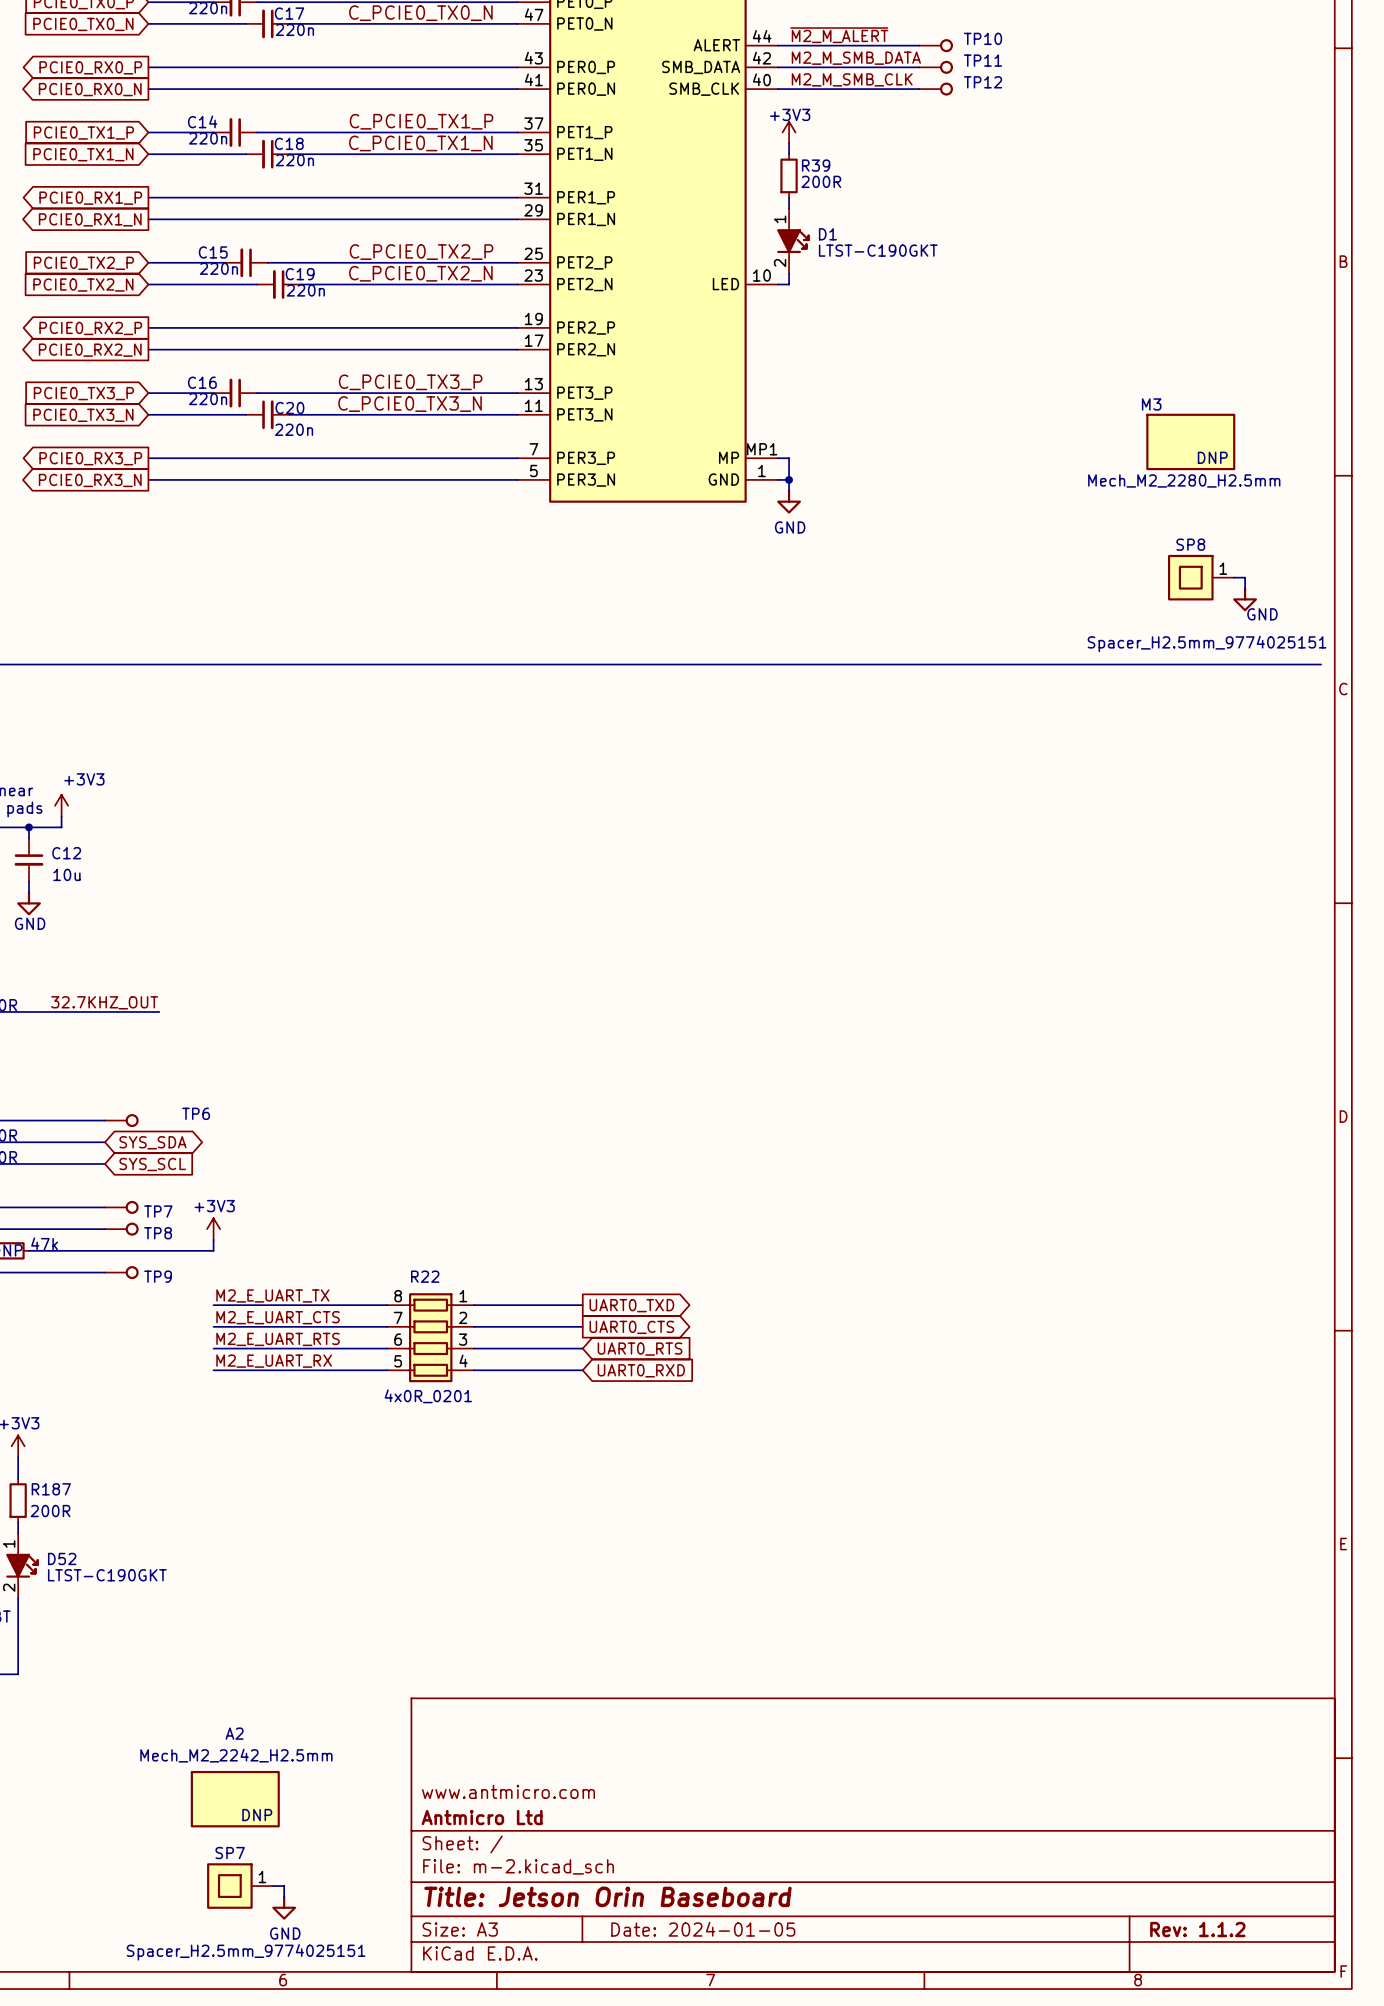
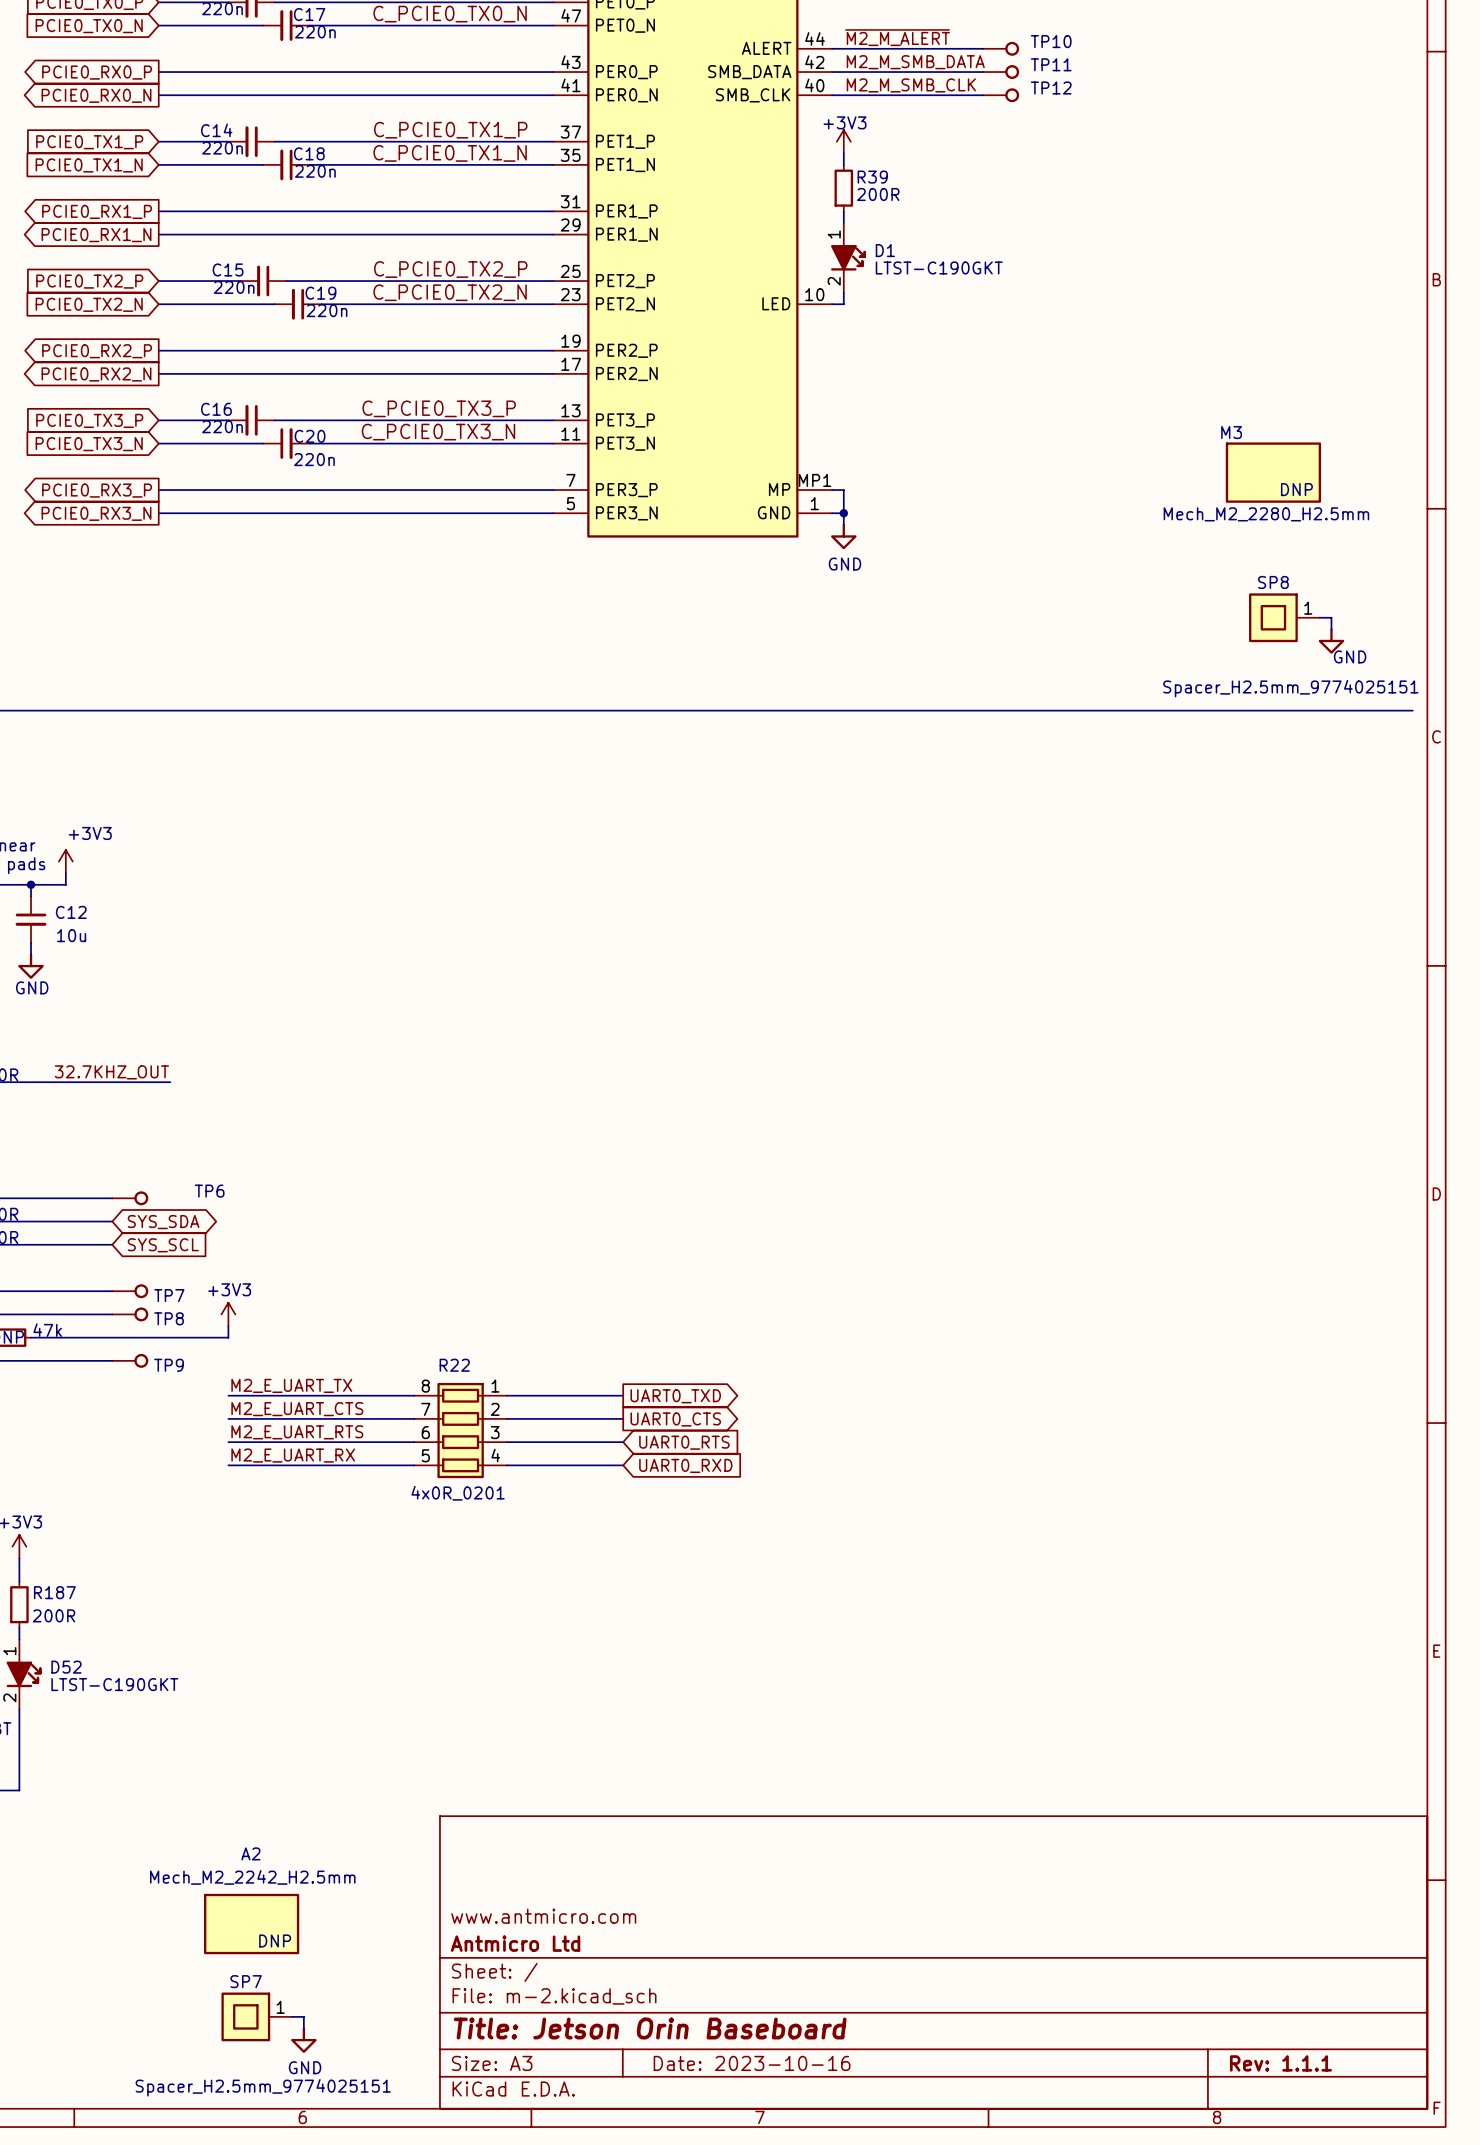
title block: Date: 2024-01-05 (703, 1929) -> Date: 2023-10-16 (752, 2063)
title block: Rev: 1.1.2 (1197, 1929) -> Rev: 1.1.1 (1280, 2063)

